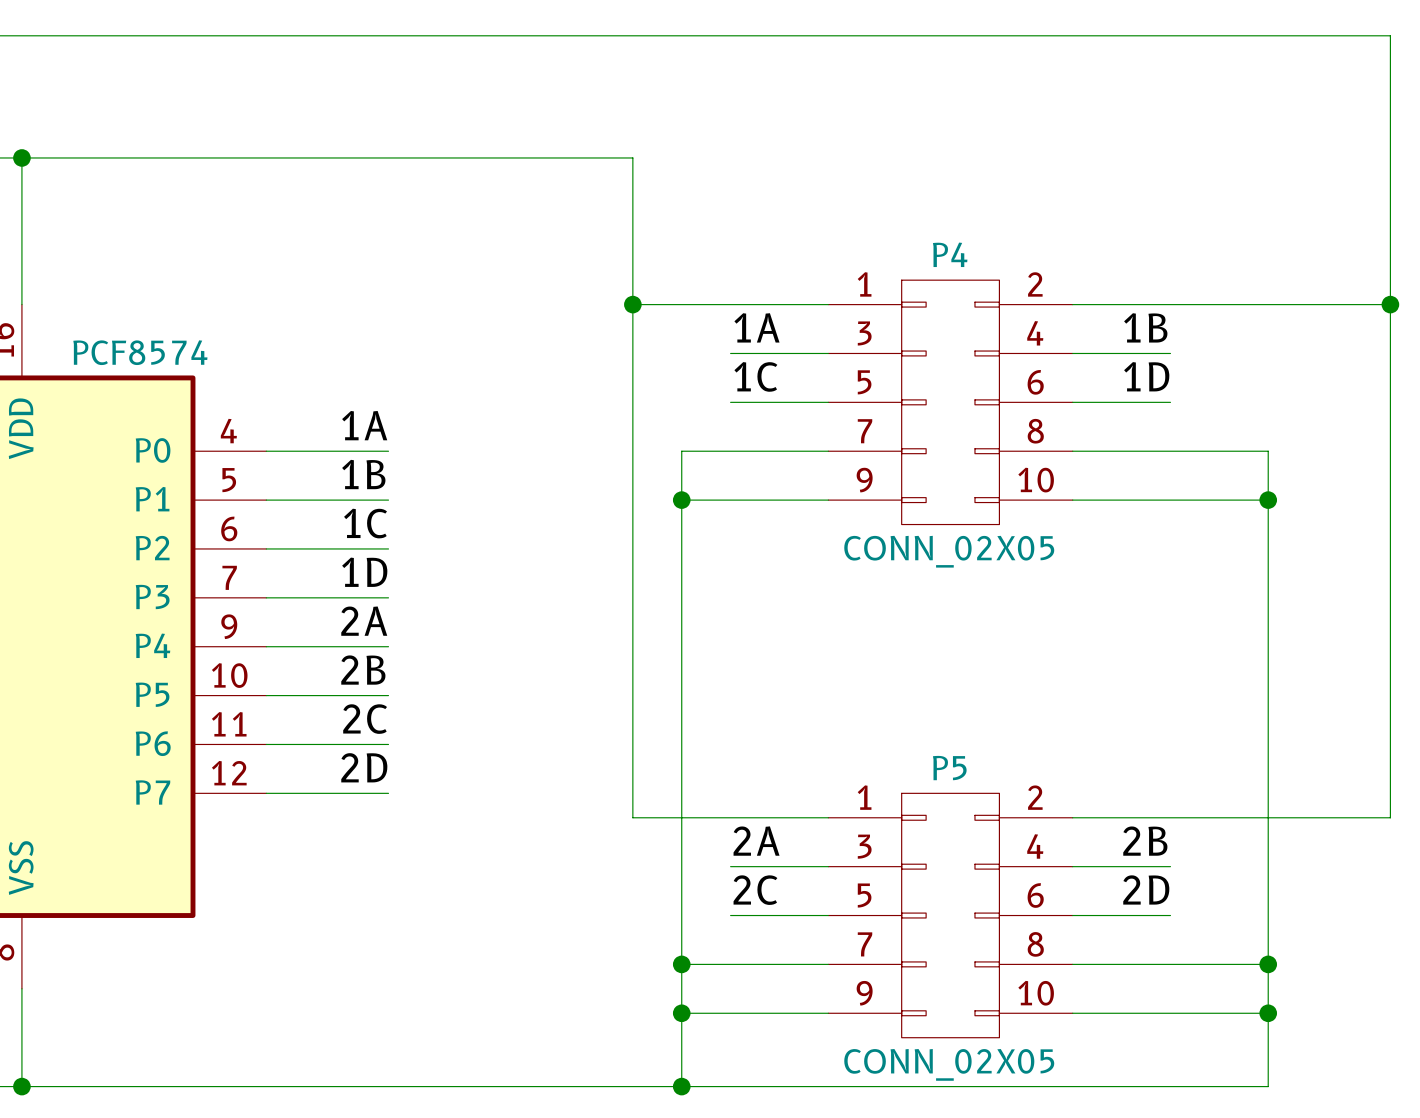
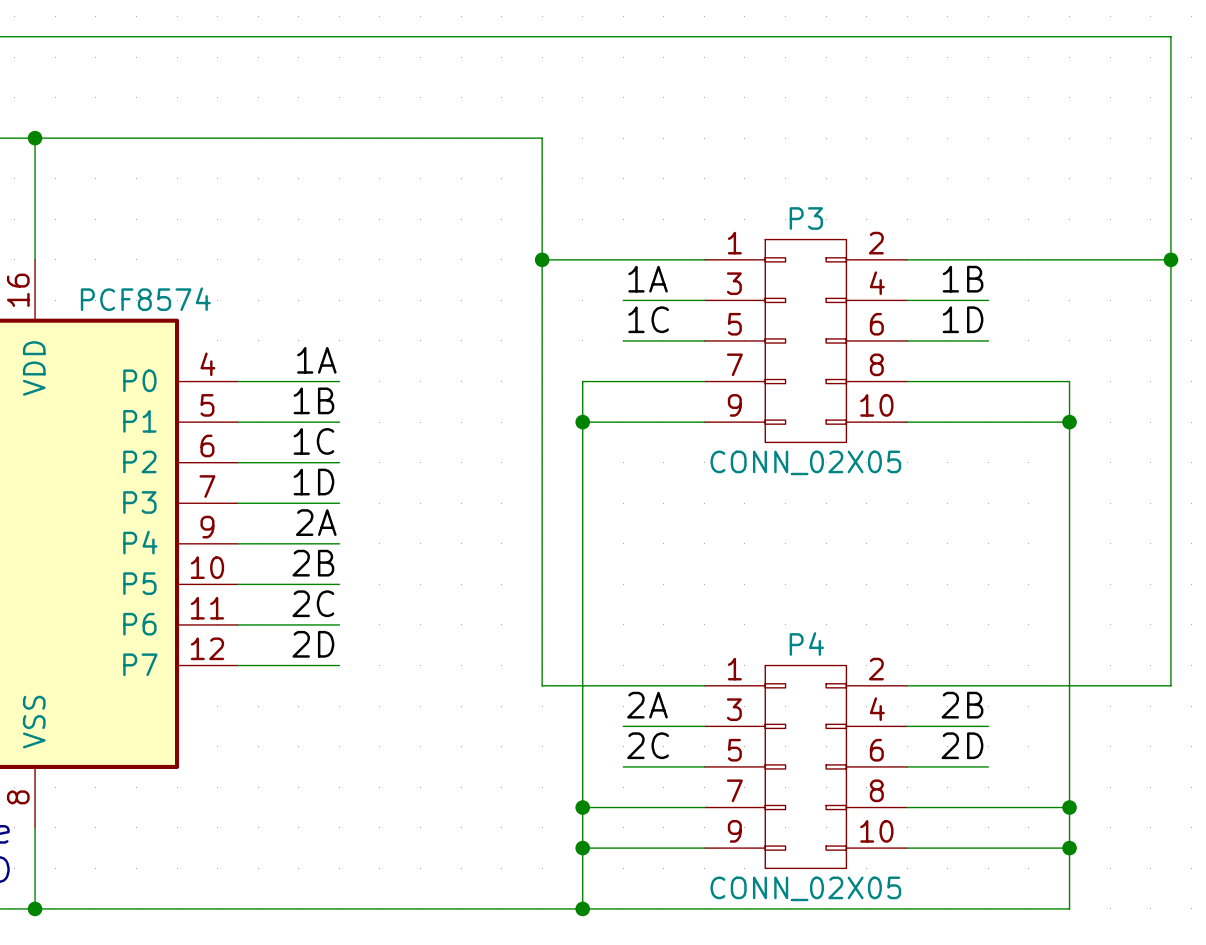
P4 name: P4 (950, 254) -> P3 (806, 218)
P5 name: P5 (949, 768) -> P4 (806, 644)

